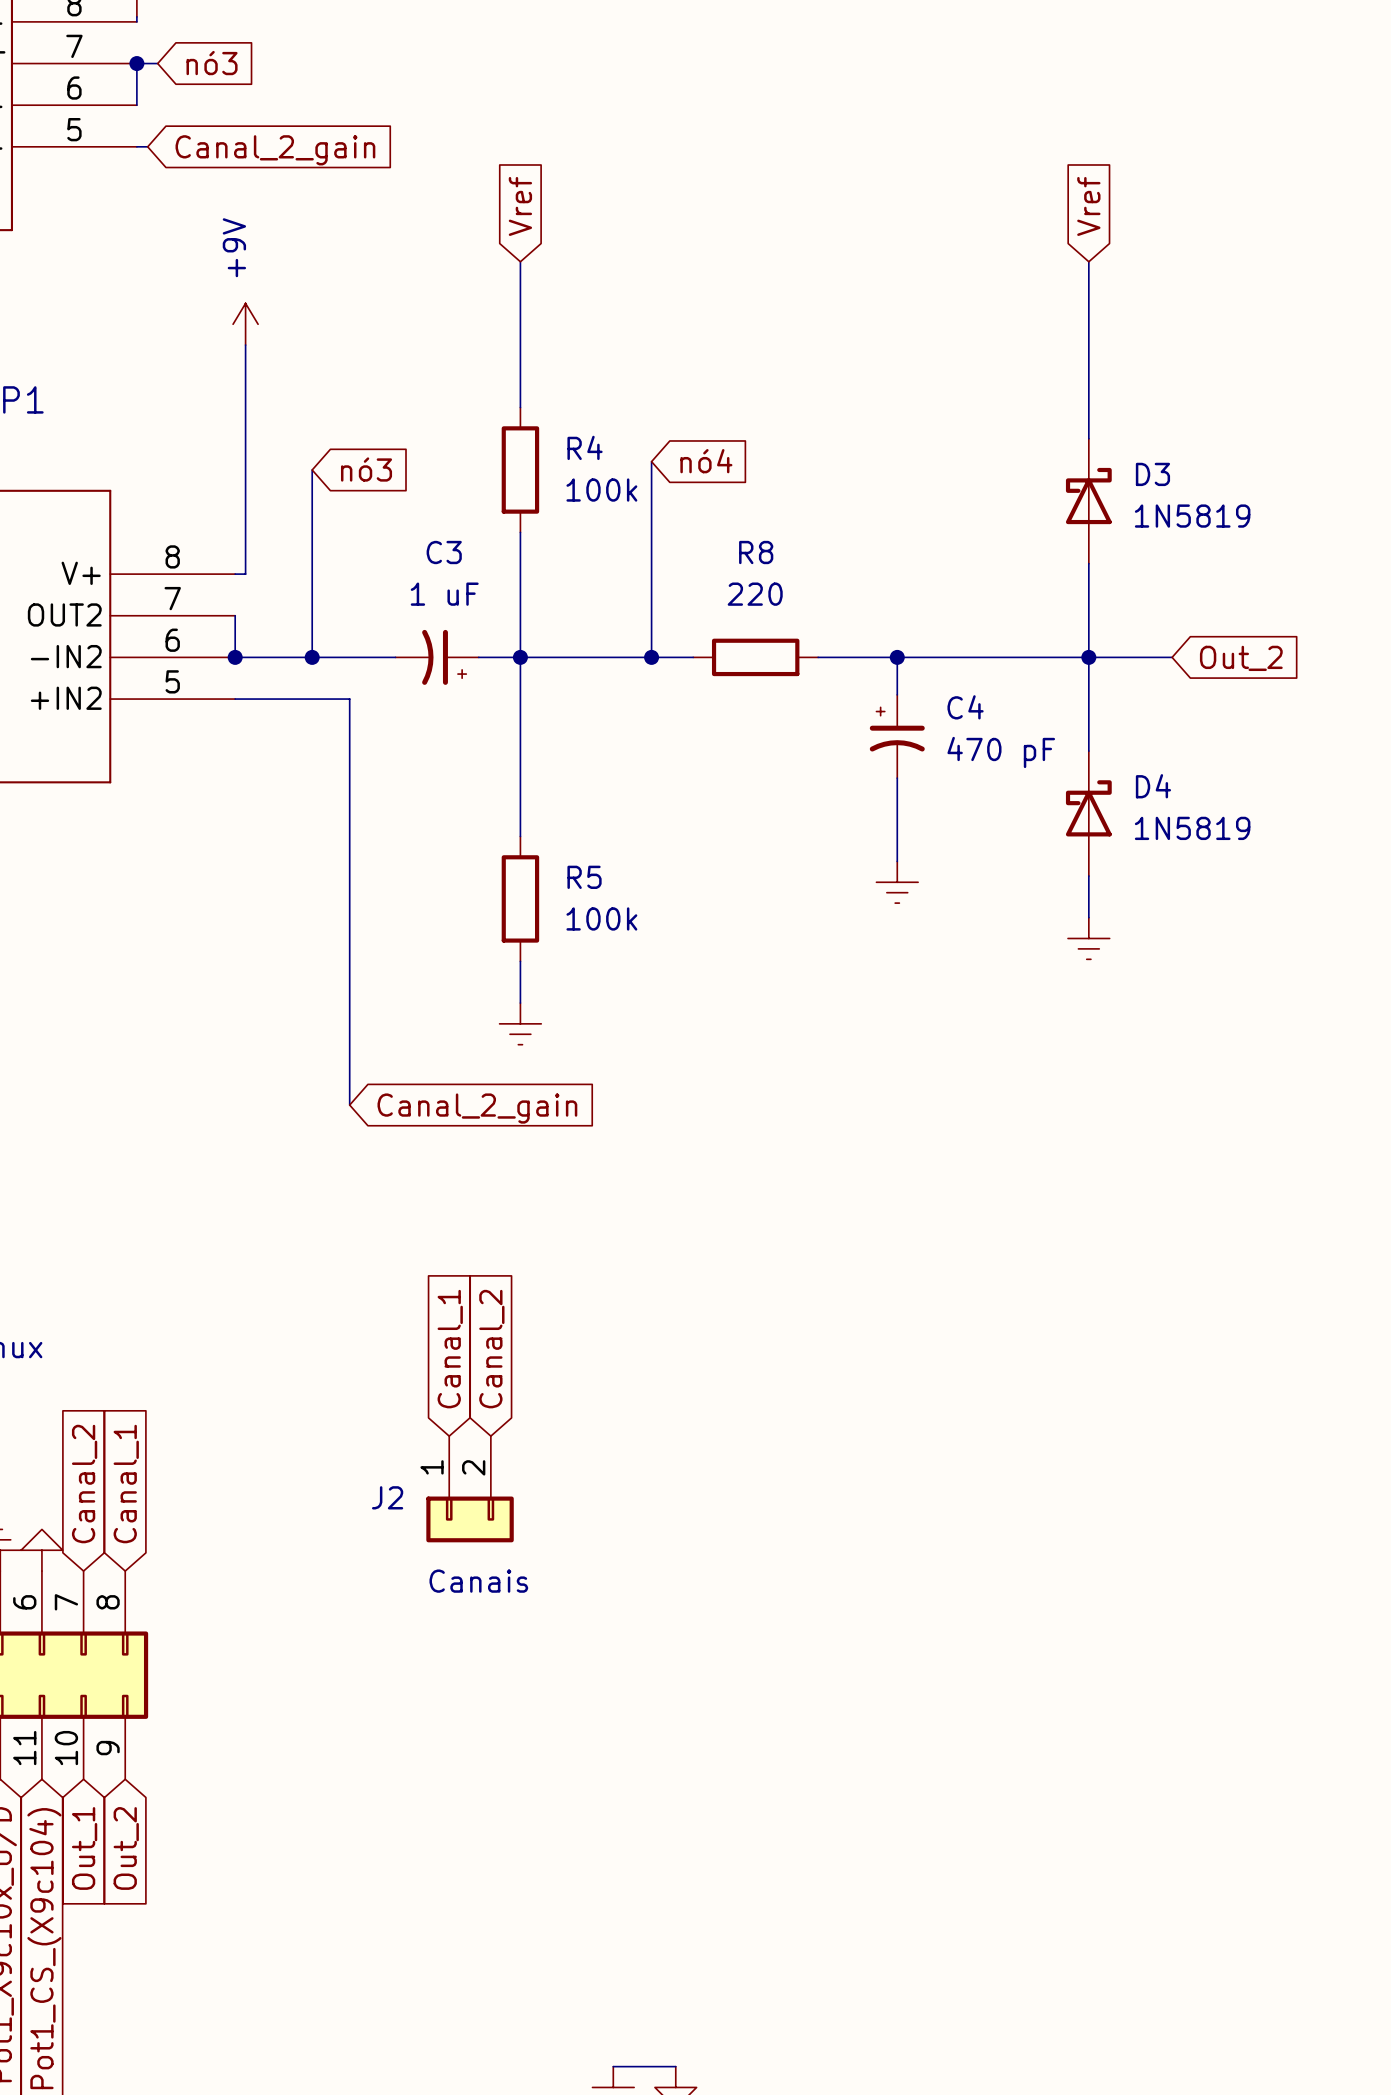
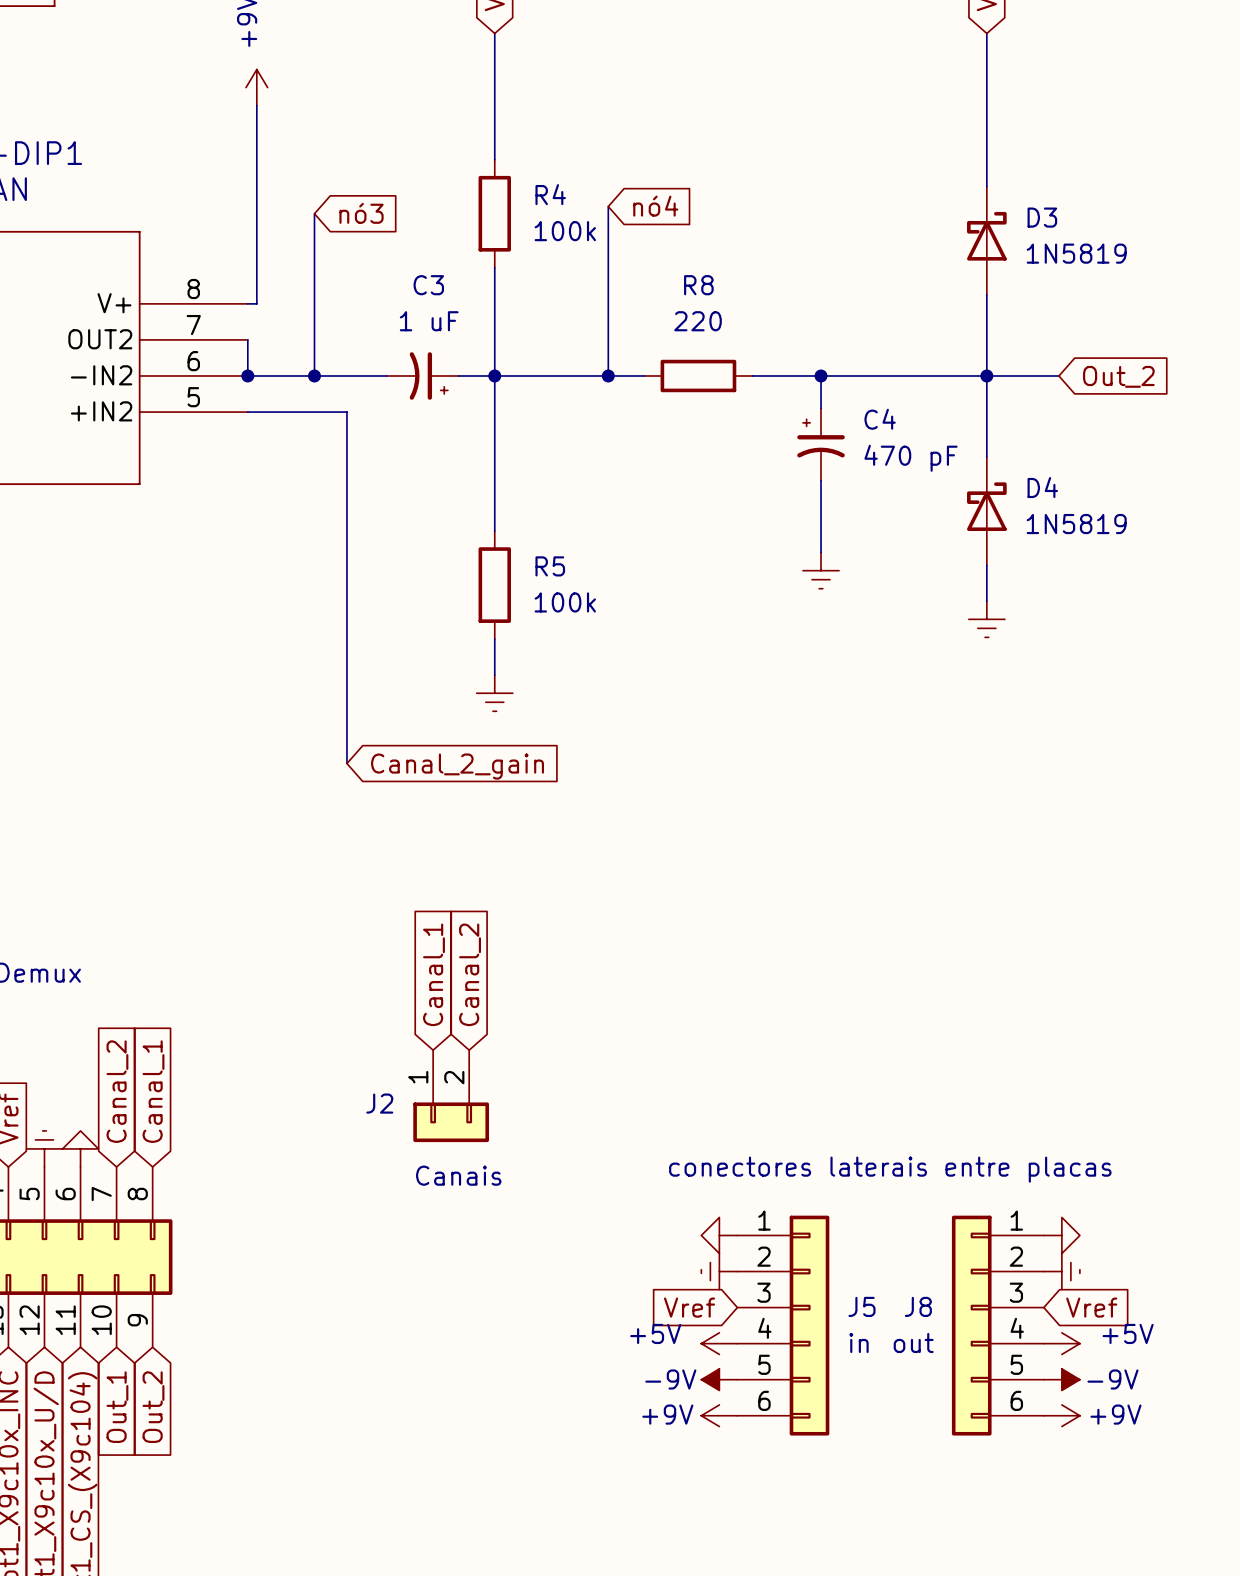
text: none -> conectores laterais entre placas (890, 1169)
power symbol: none -> (719, 1235)
power symbol: none -> (1061, 1235)
power symbol: none -> (719, 1271)
power symbol: none -> (1061, 1271)
global label: none -> Vref (689, 1307)
global label: none -> Vref (1091, 1307)
J5: none -> in (783, 1325)
J8: none -> out (997, 1325)
power symbol: none -> +5V (719, 1343)
power symbol: none -> +5V (1061, 1343)
power symbol: none -> -9V (719, 1379)
power symbol: none -> -9V (1061, 1379)
power symbol: none -> +9V (719, 1415)
power symbol: none -> +9V (1061, 1415)

